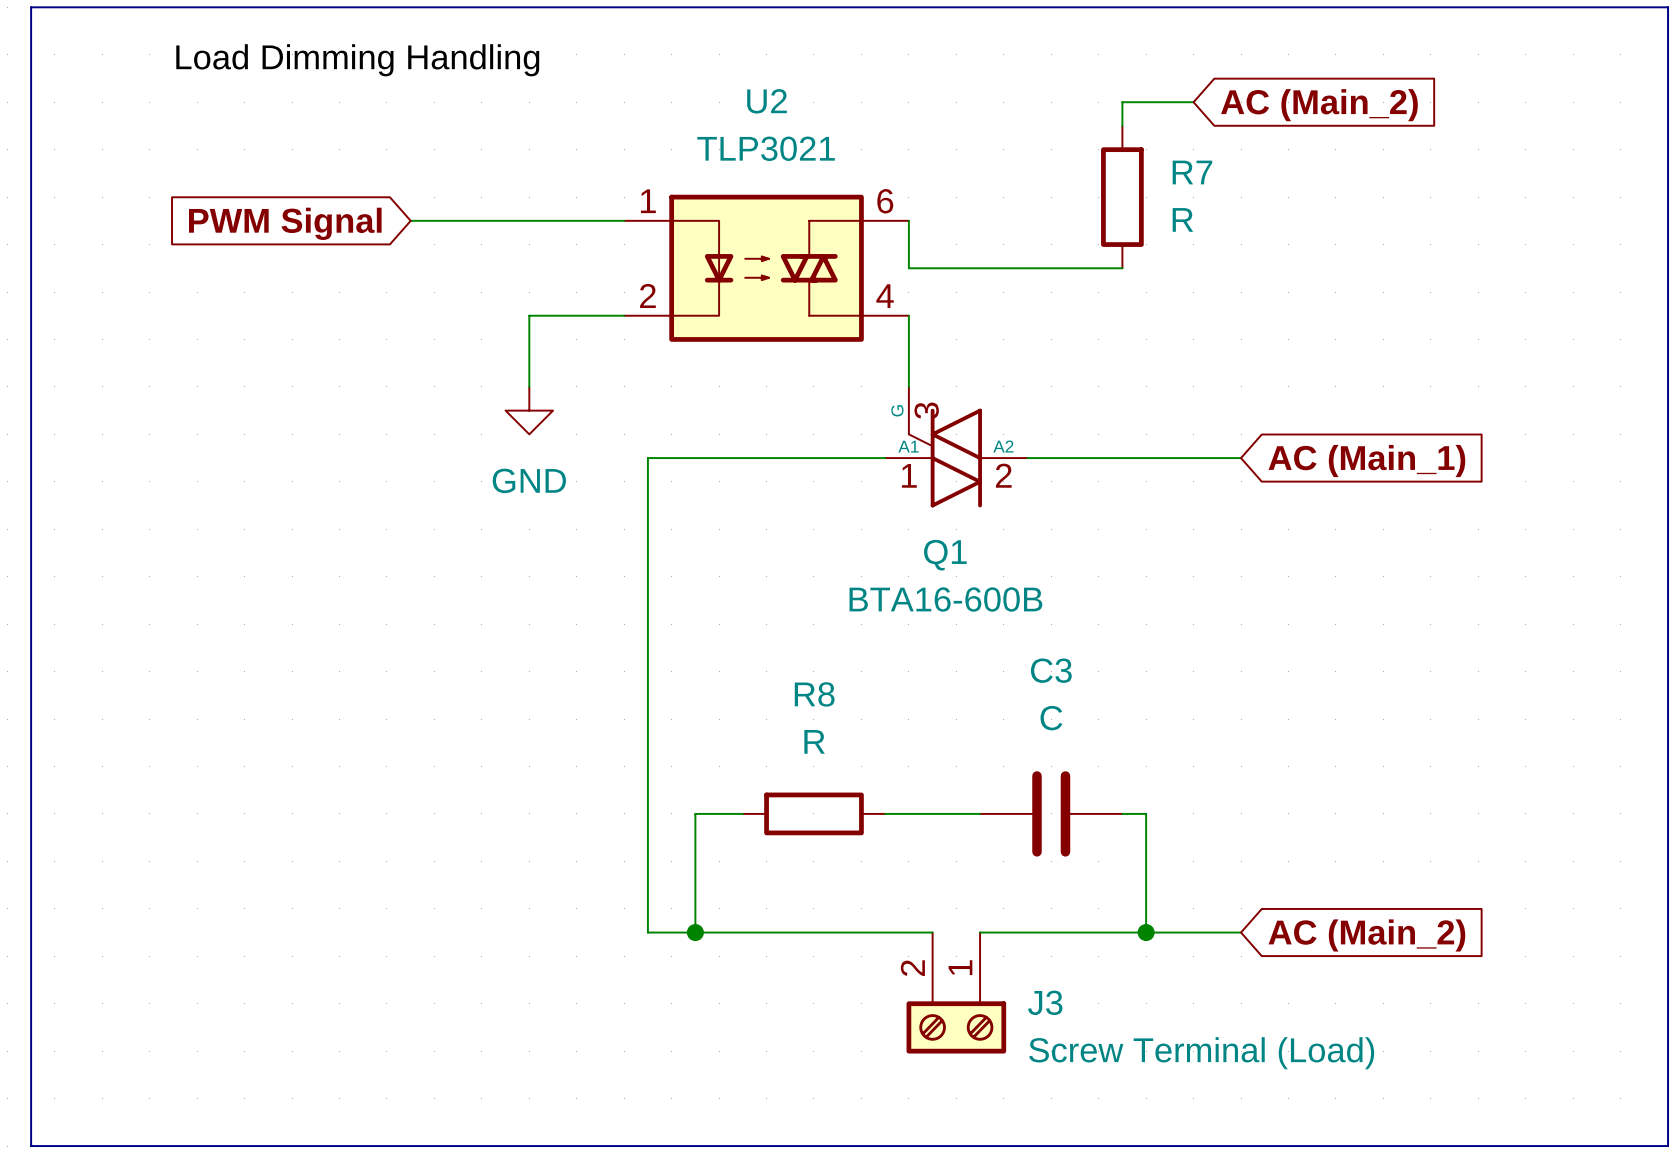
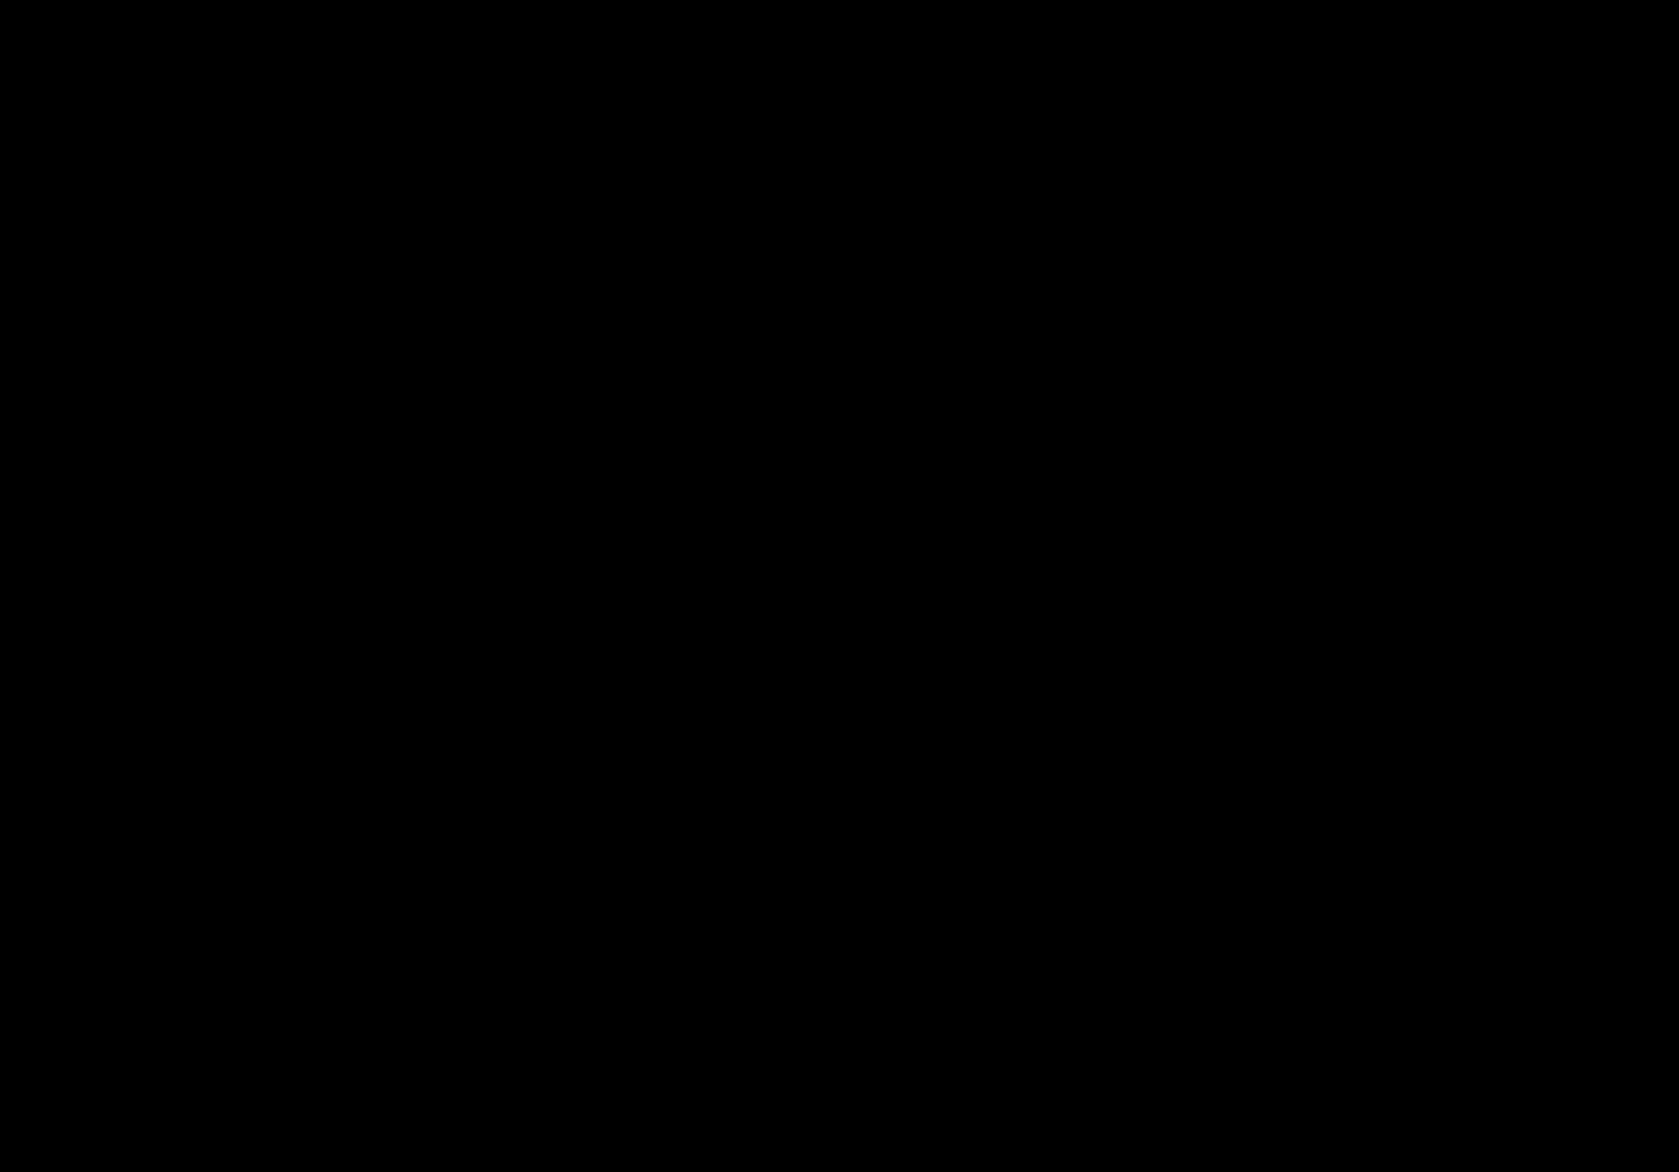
line: (31, 7) (1668, 7) (1668, 1146) (31, 1146) (31, 7) -> none
label: Load Dimming Handling (357, 60) -> none
wire: (1193, 102) (1122, 102) (1122, 125) -> none
global label: AC (Main_2) (1319, 105) -> none
R7: R (1122, 197) -> none
wire: (410, 220) (624, 220) -> none
wire: (908, 220) (908, 268) (1122, 268) -> none
global label: PWM Signal (285, 223) -> none
U2: TLP3021 (766, 268) -> none
wire: (624, 315) (529, 315) (529, 386) -> none
wire: (908, 315) (908, 386) -> none
power symbol: GND (529, 410) -> none
Q1: BTA16-600B (956, 447) -> none
wire: (885, 458) (647, 458) (647, 932) (932, 932) -> none
wire: (1027, 458) (1241, 458) -> none
global label: AC (Main_1) (1366, 461) -> none
wire: (742, 813) (695, 813) (695, 932) -> none
R8: R (813, 813) -> none
wire: (885, 813) (980, 813) -> none
C3: C (1051, 813) -> none
wire: (1122, 813) (1146, 813) (1146, 932) -> none
junction: (695, 932) -> none
wire: (980, 932) (1241, 932) -> none
junction: (1146, 932) -> none
global label: AC (Main_2) (1366, 935) -> none
J3: Screw Terminal (Load) (956, 993) -> none

